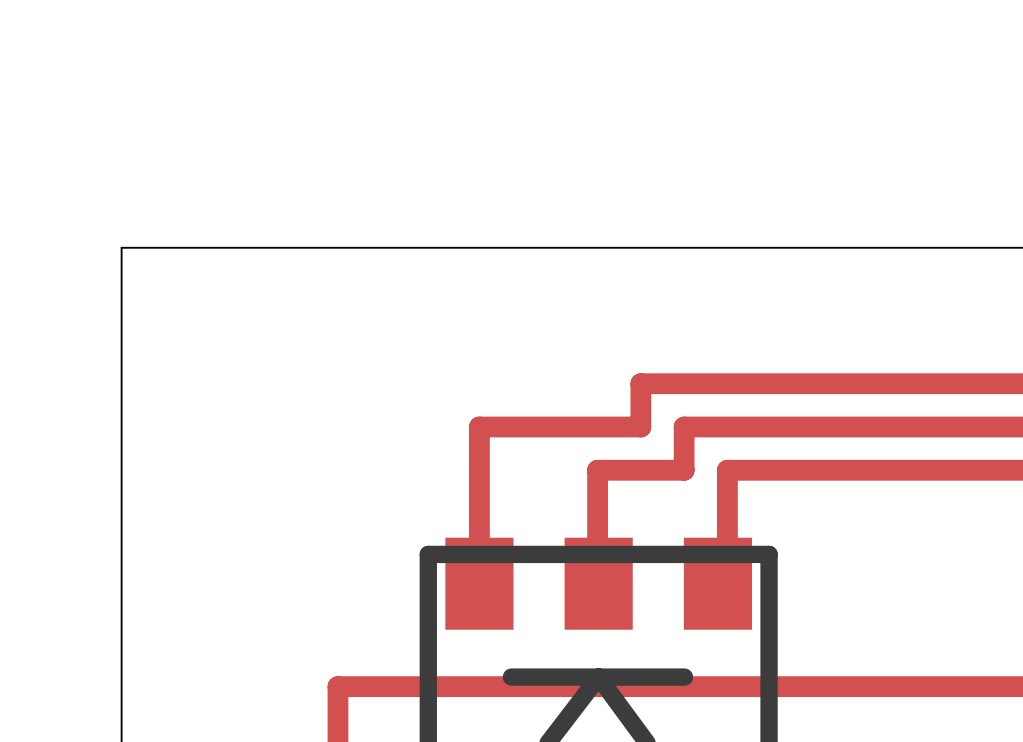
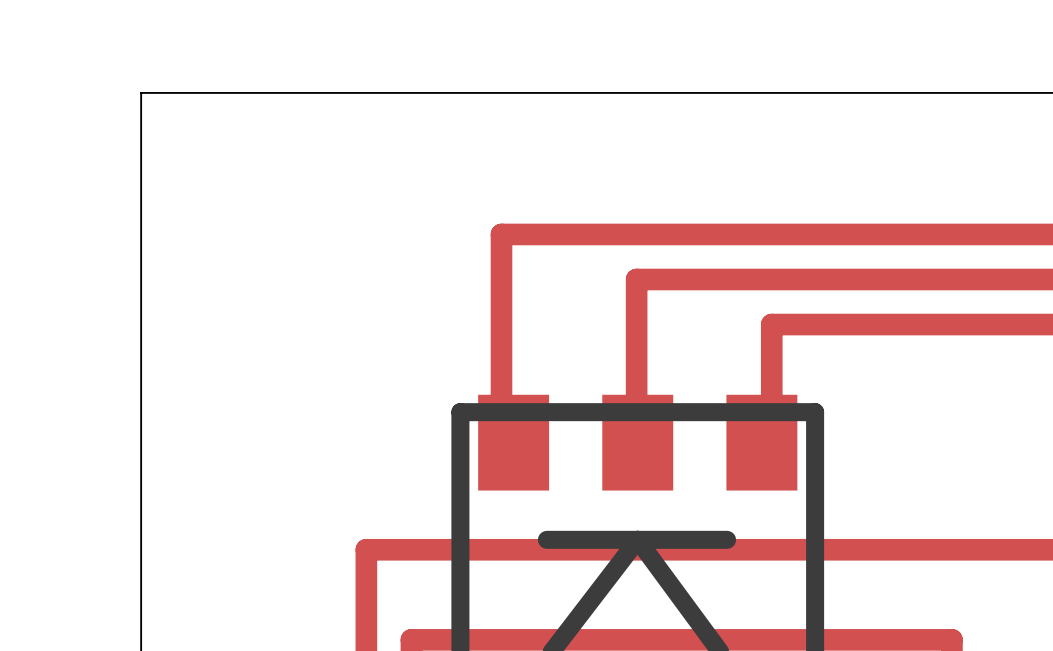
track: (640, 383) (640, 426) -> (681, 234) (501, 234) (501, 442)
track: (597, 426) (479, 426) (479, 583) -> (636, 279) (636, 324)
track: (684, 426) (684, 470) (597, 470) -> (726, 279) (681, 279)

